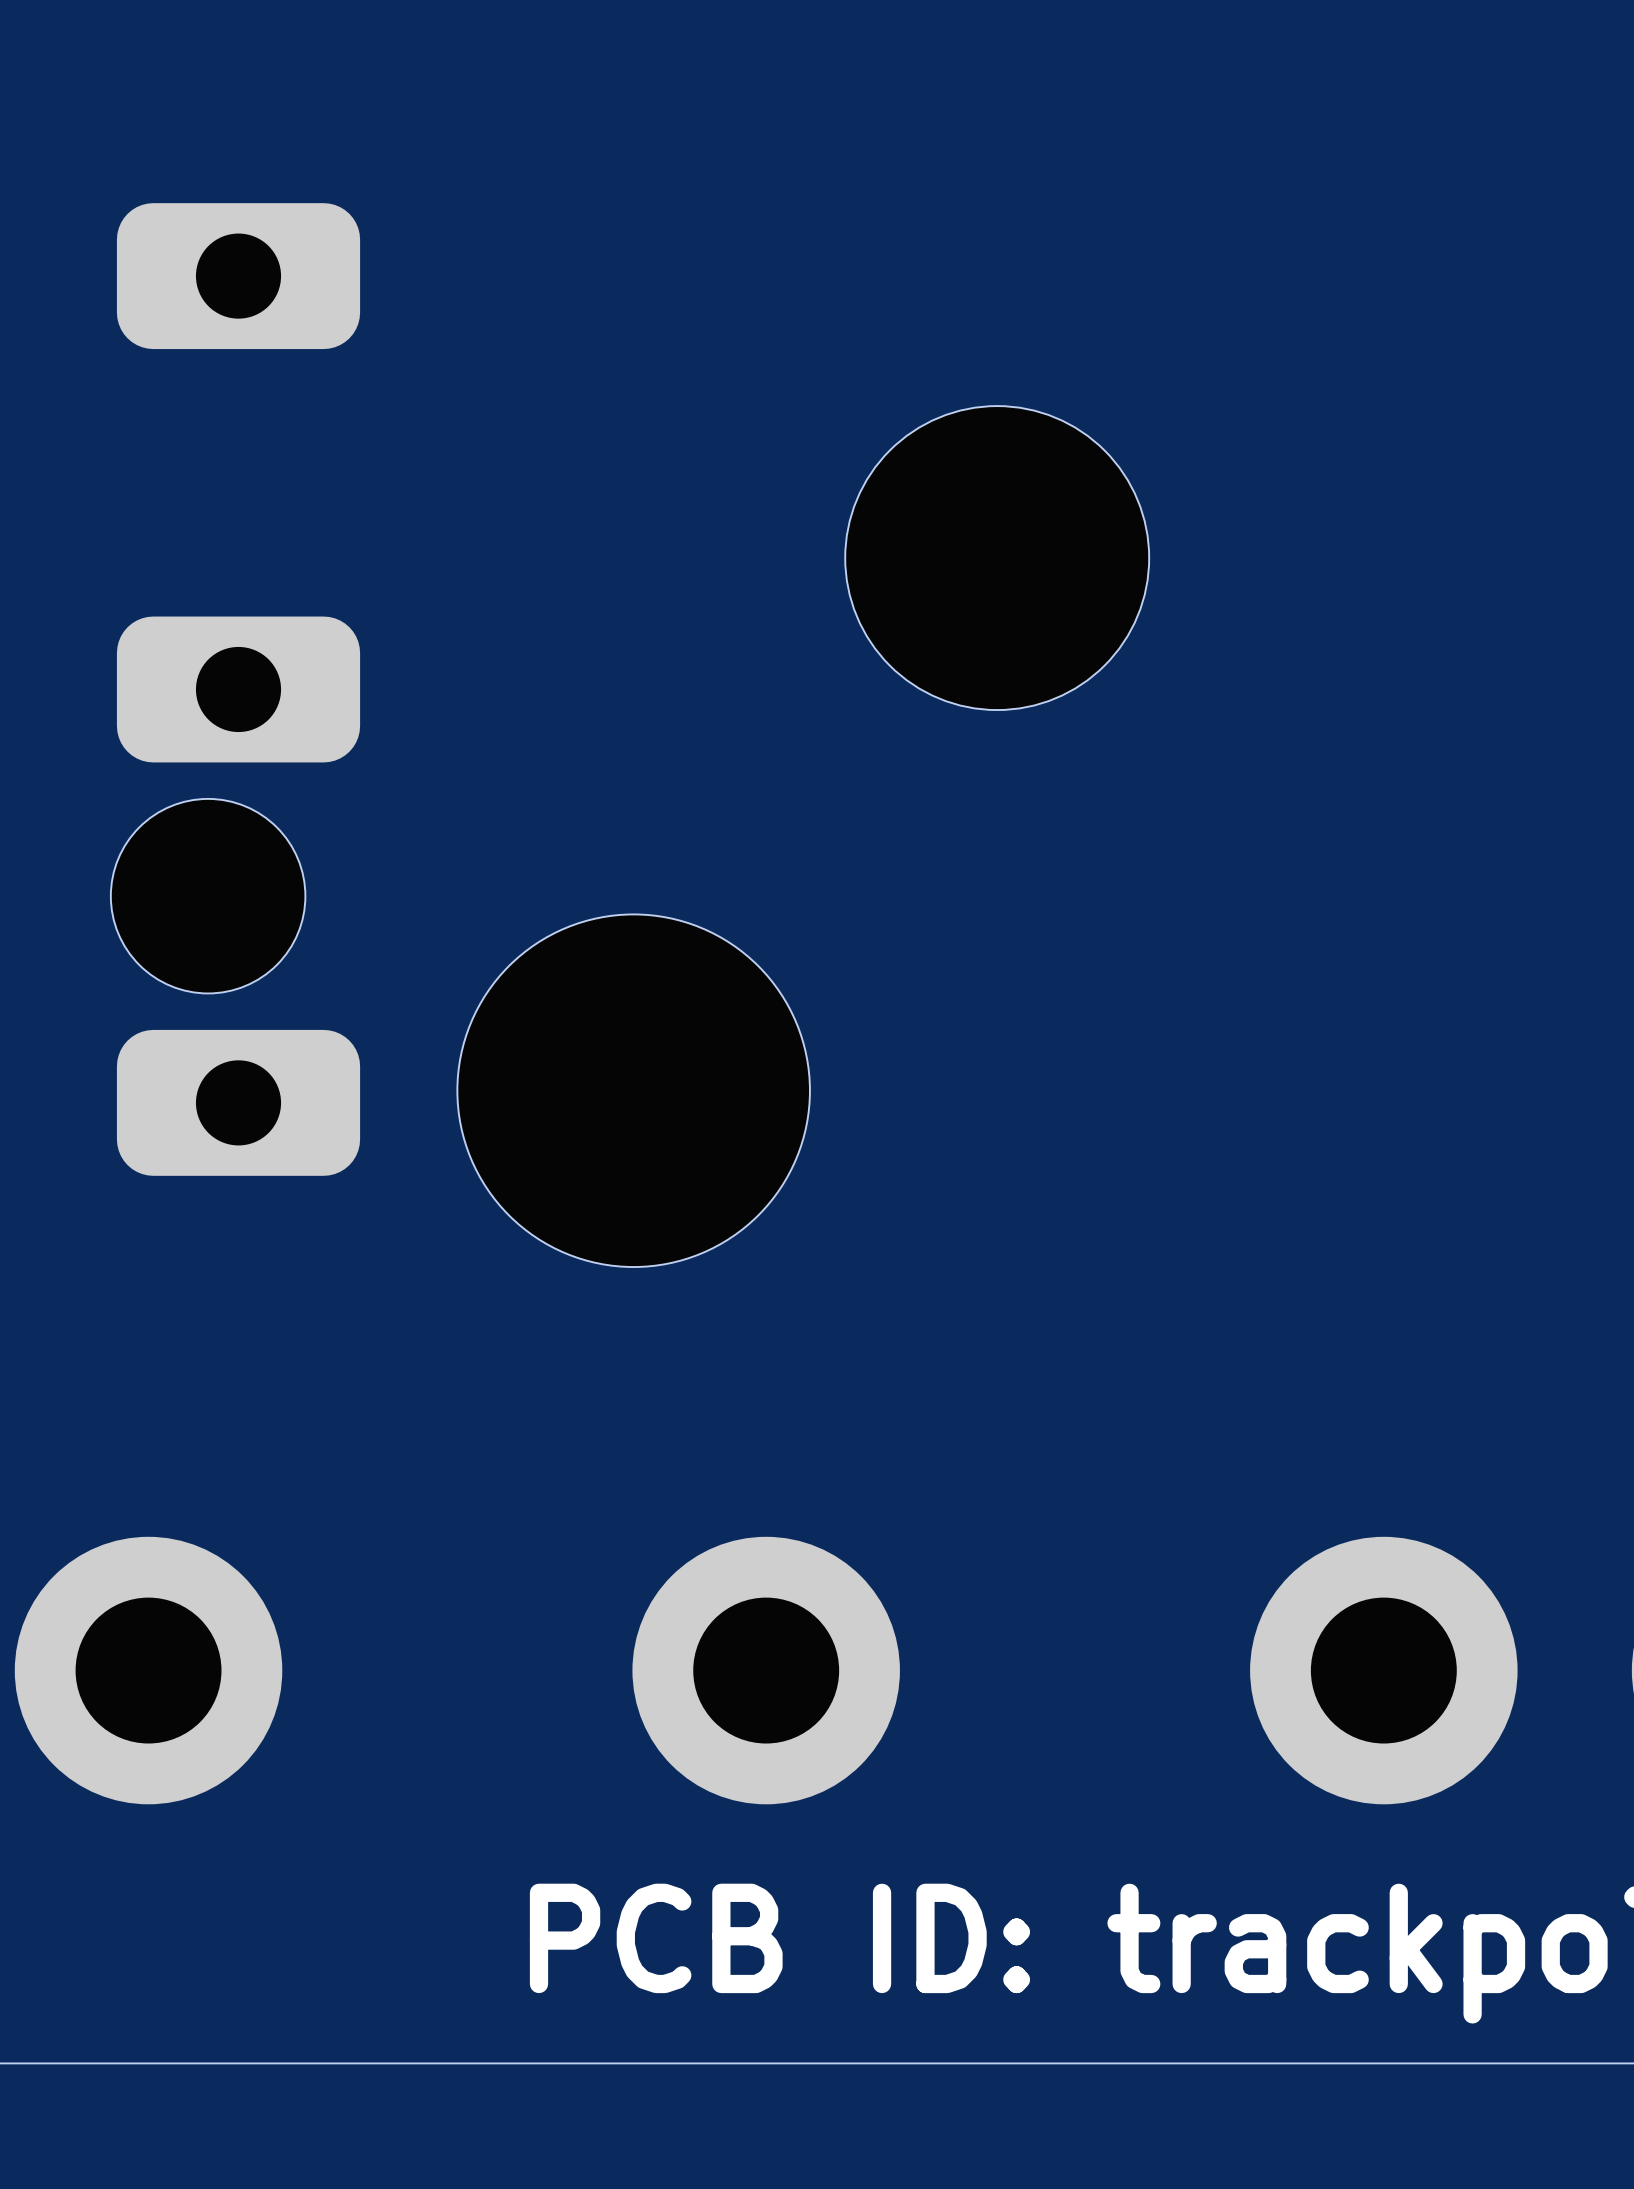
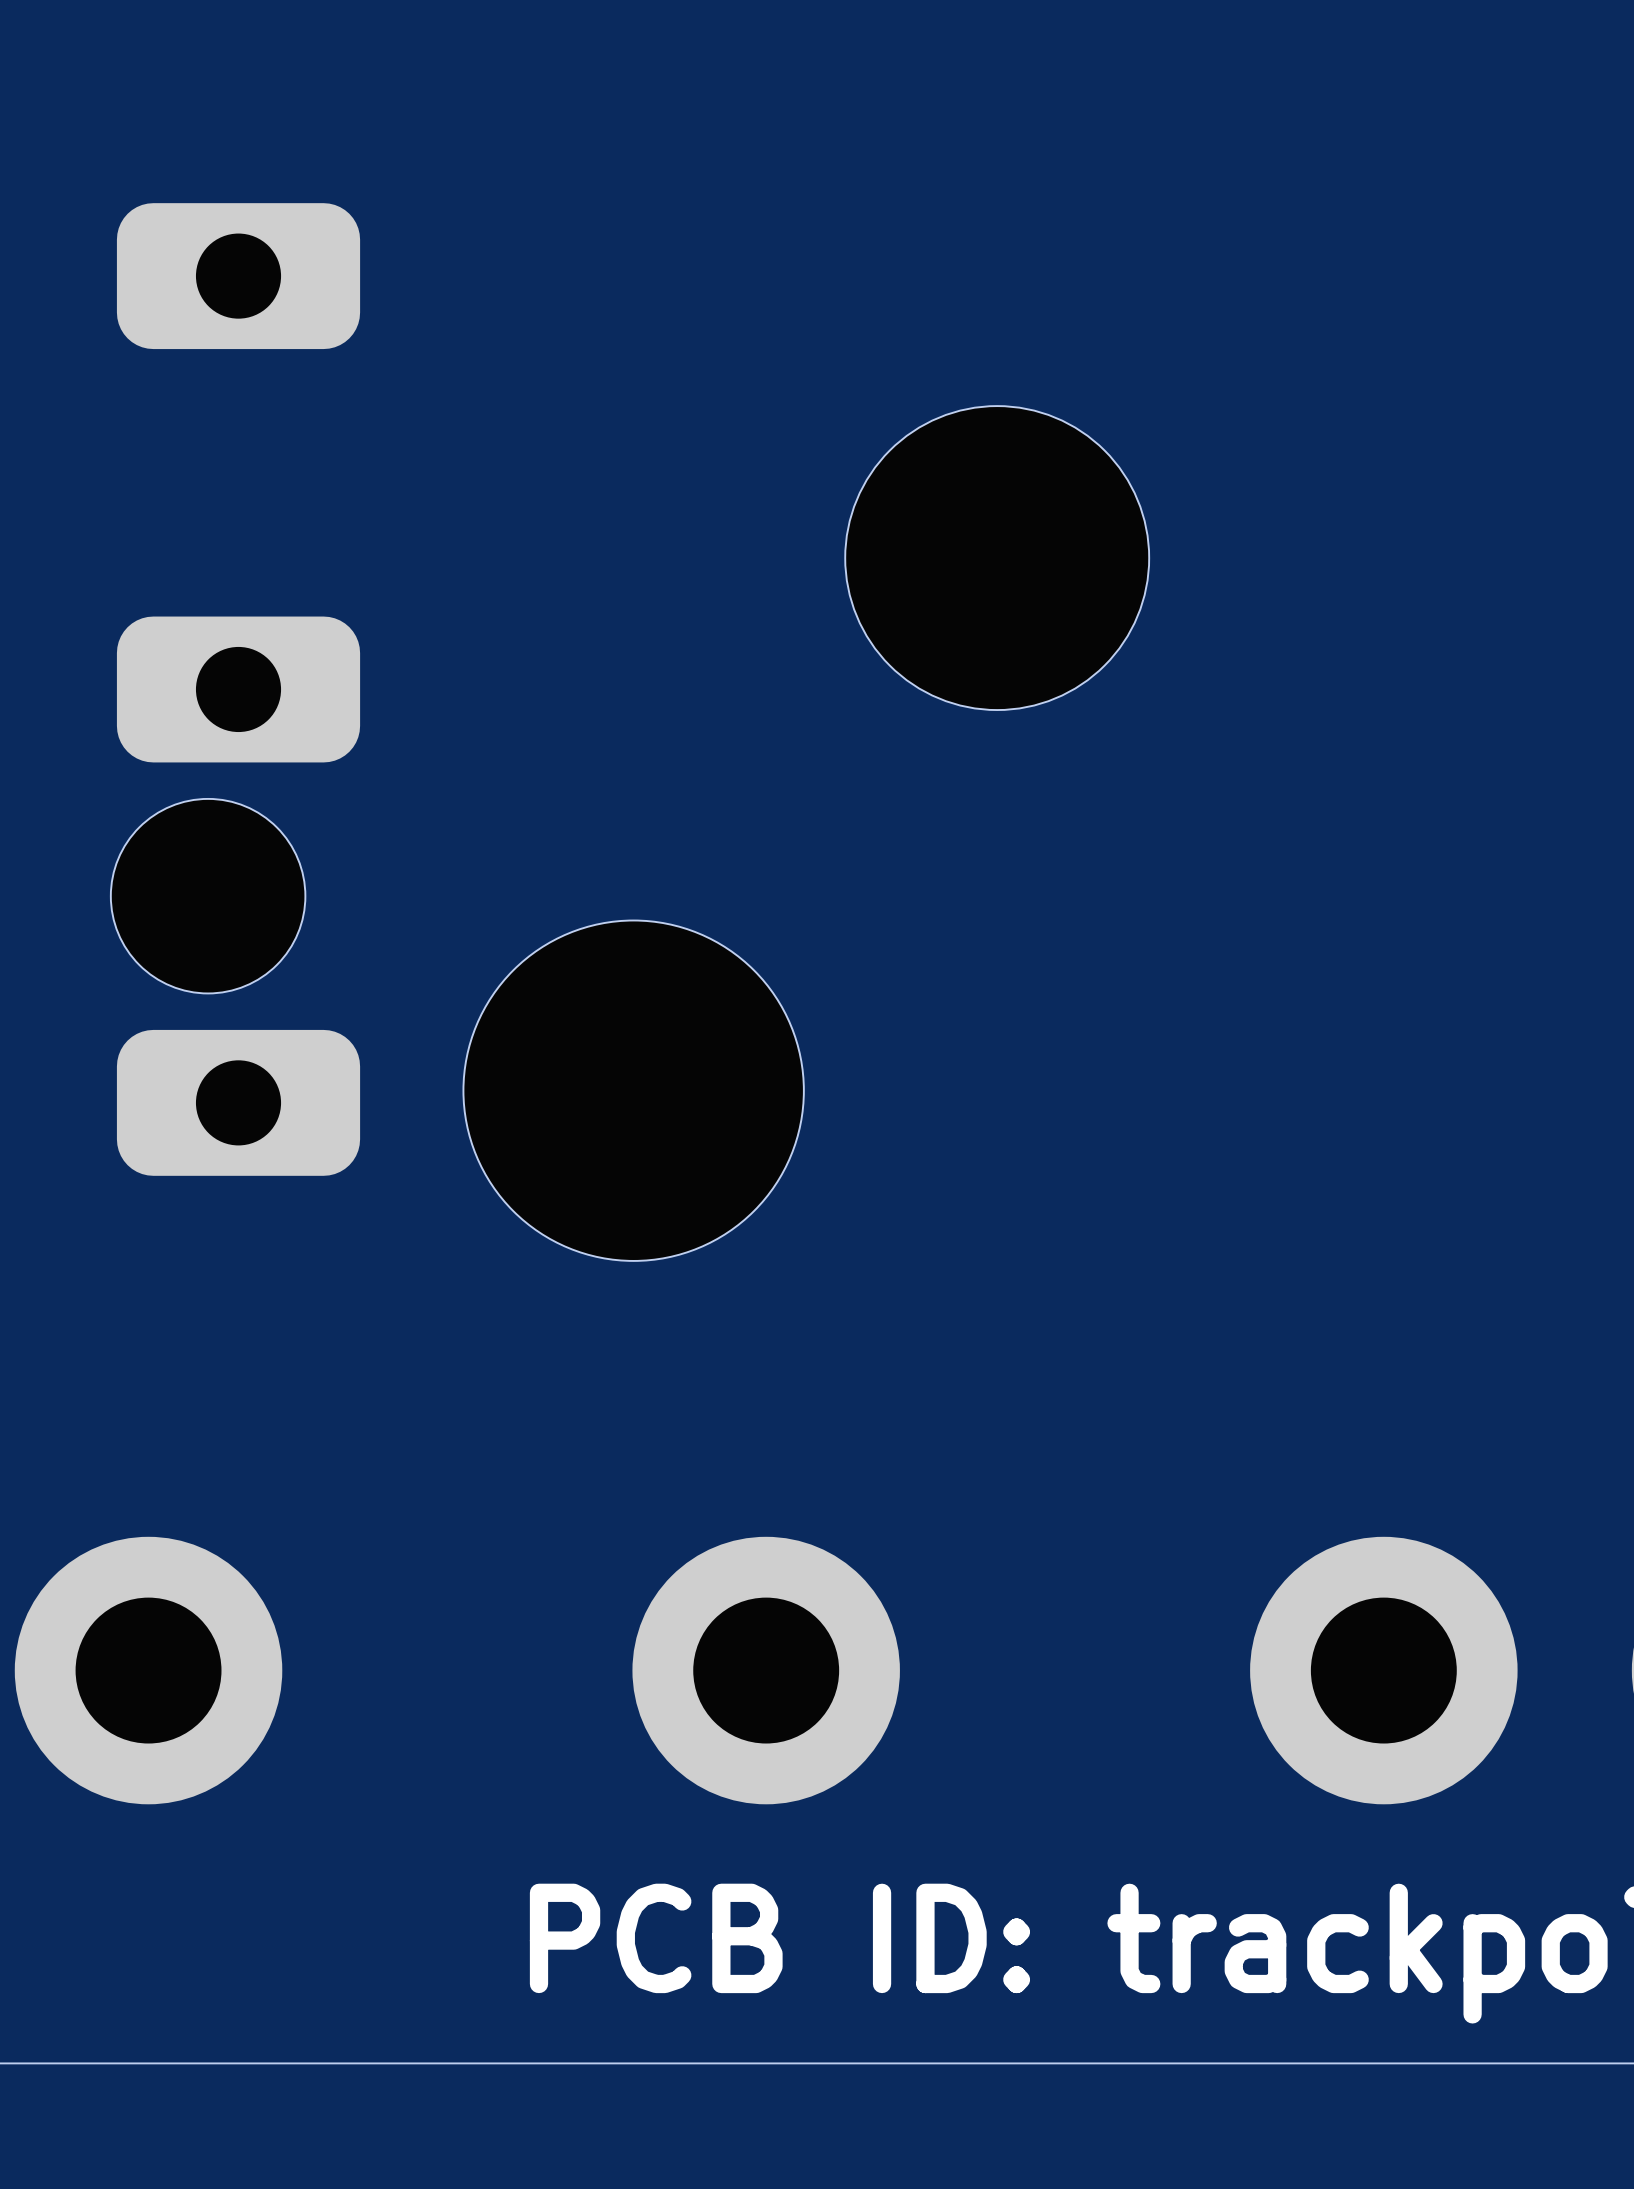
part footprint: [457, 914, 810, 1268] -> [463, 920, 804, 1261]

